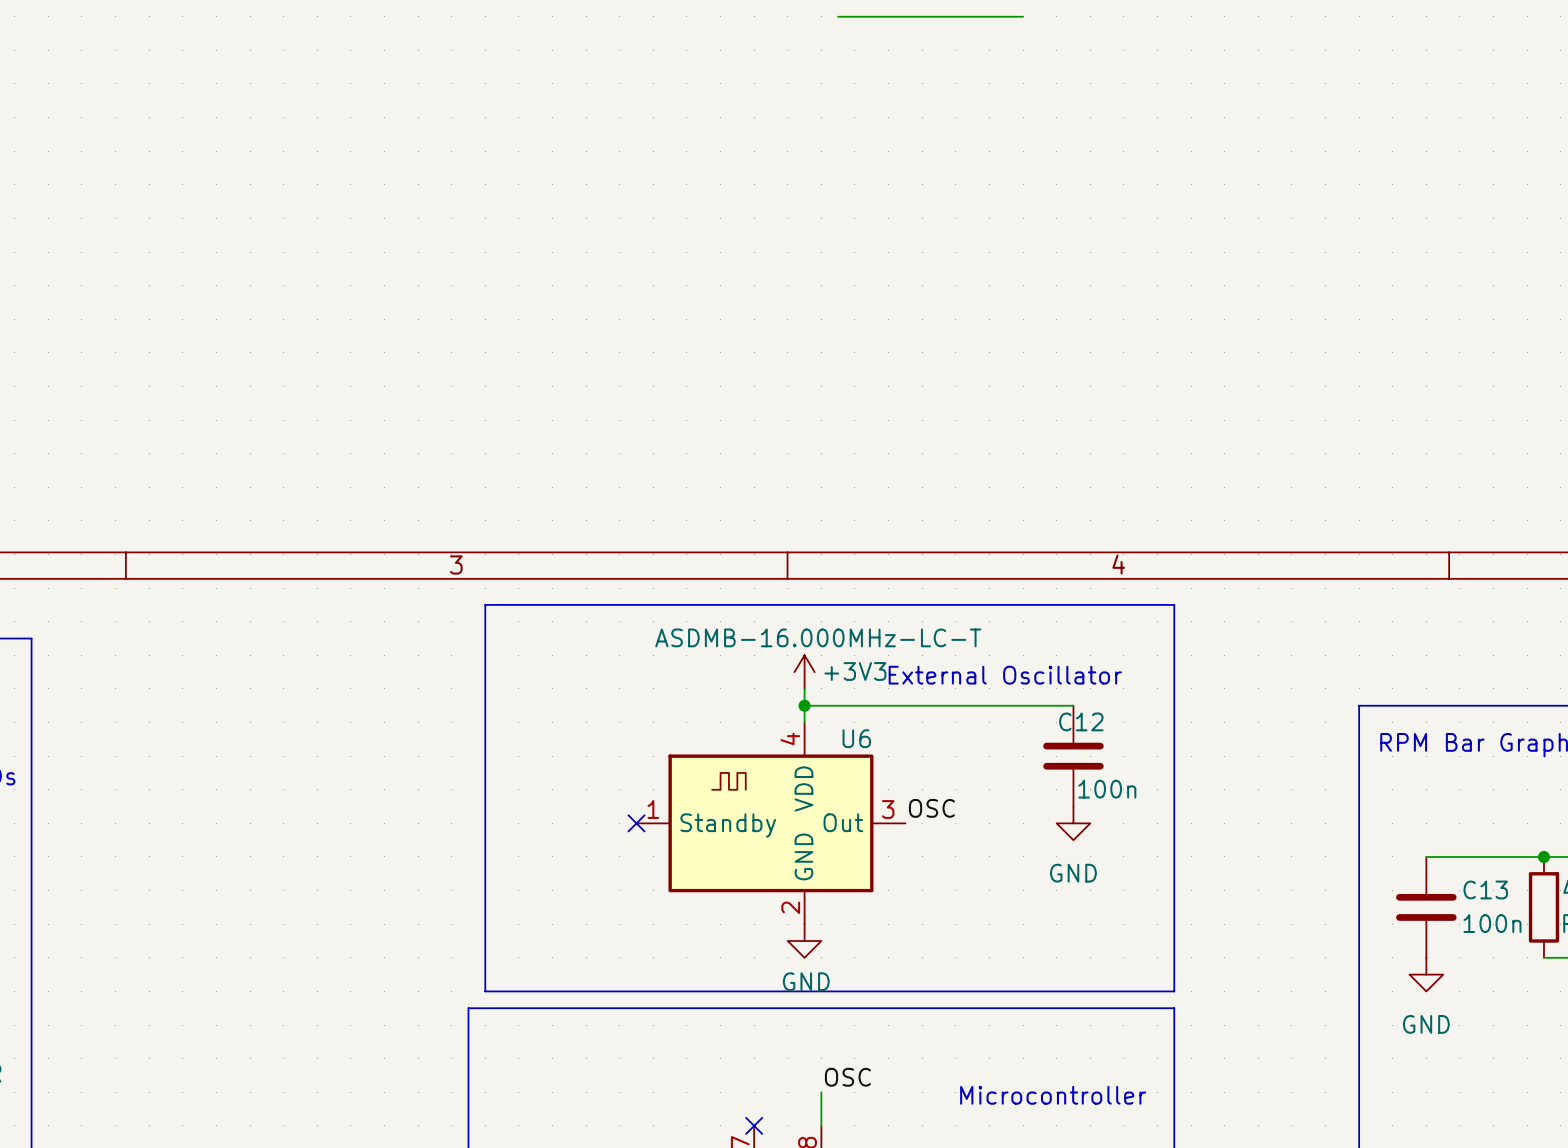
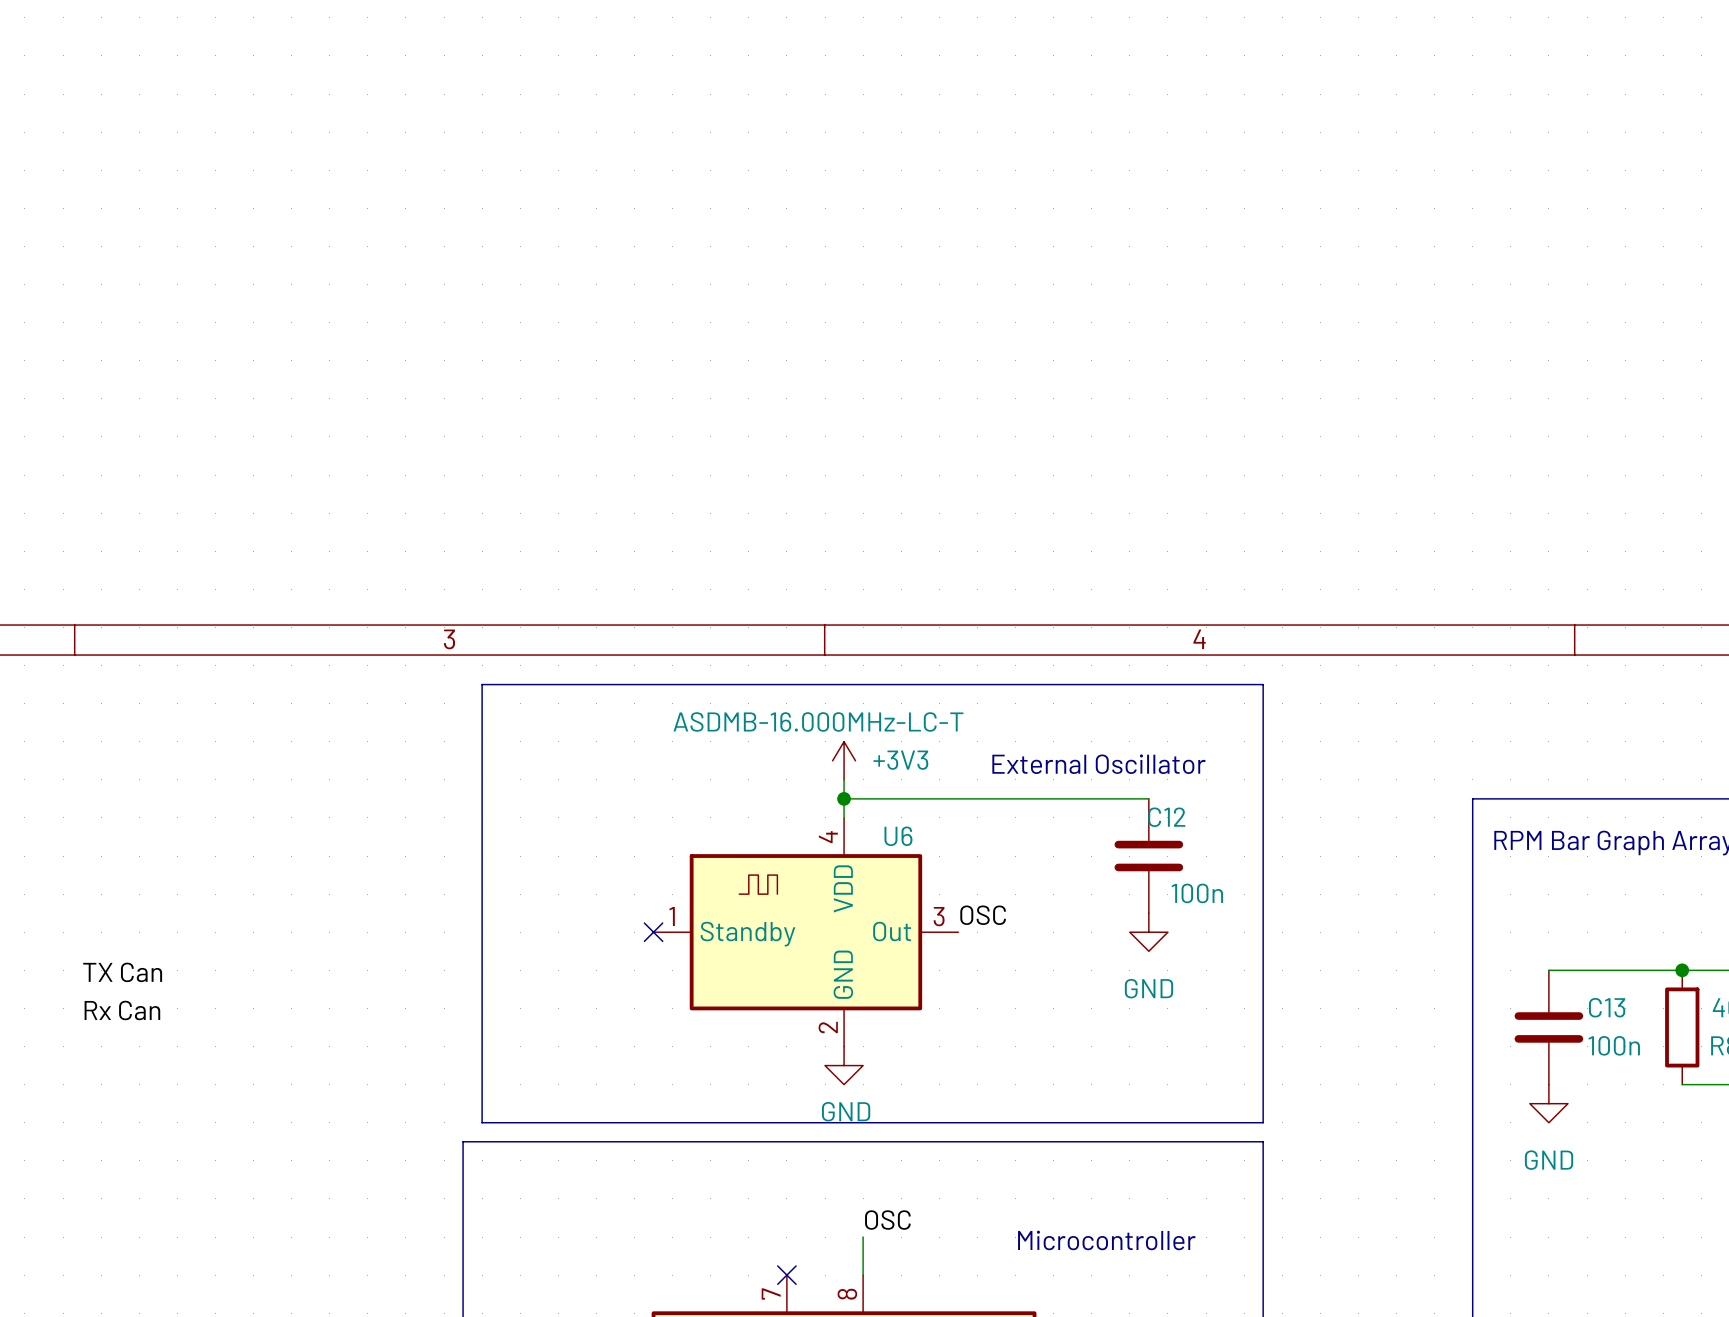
wire: (838, 16) (1023, 16) -> none
label: none -> TX Can (122, 972)
label: none -> Rx Can (122, 1010)

